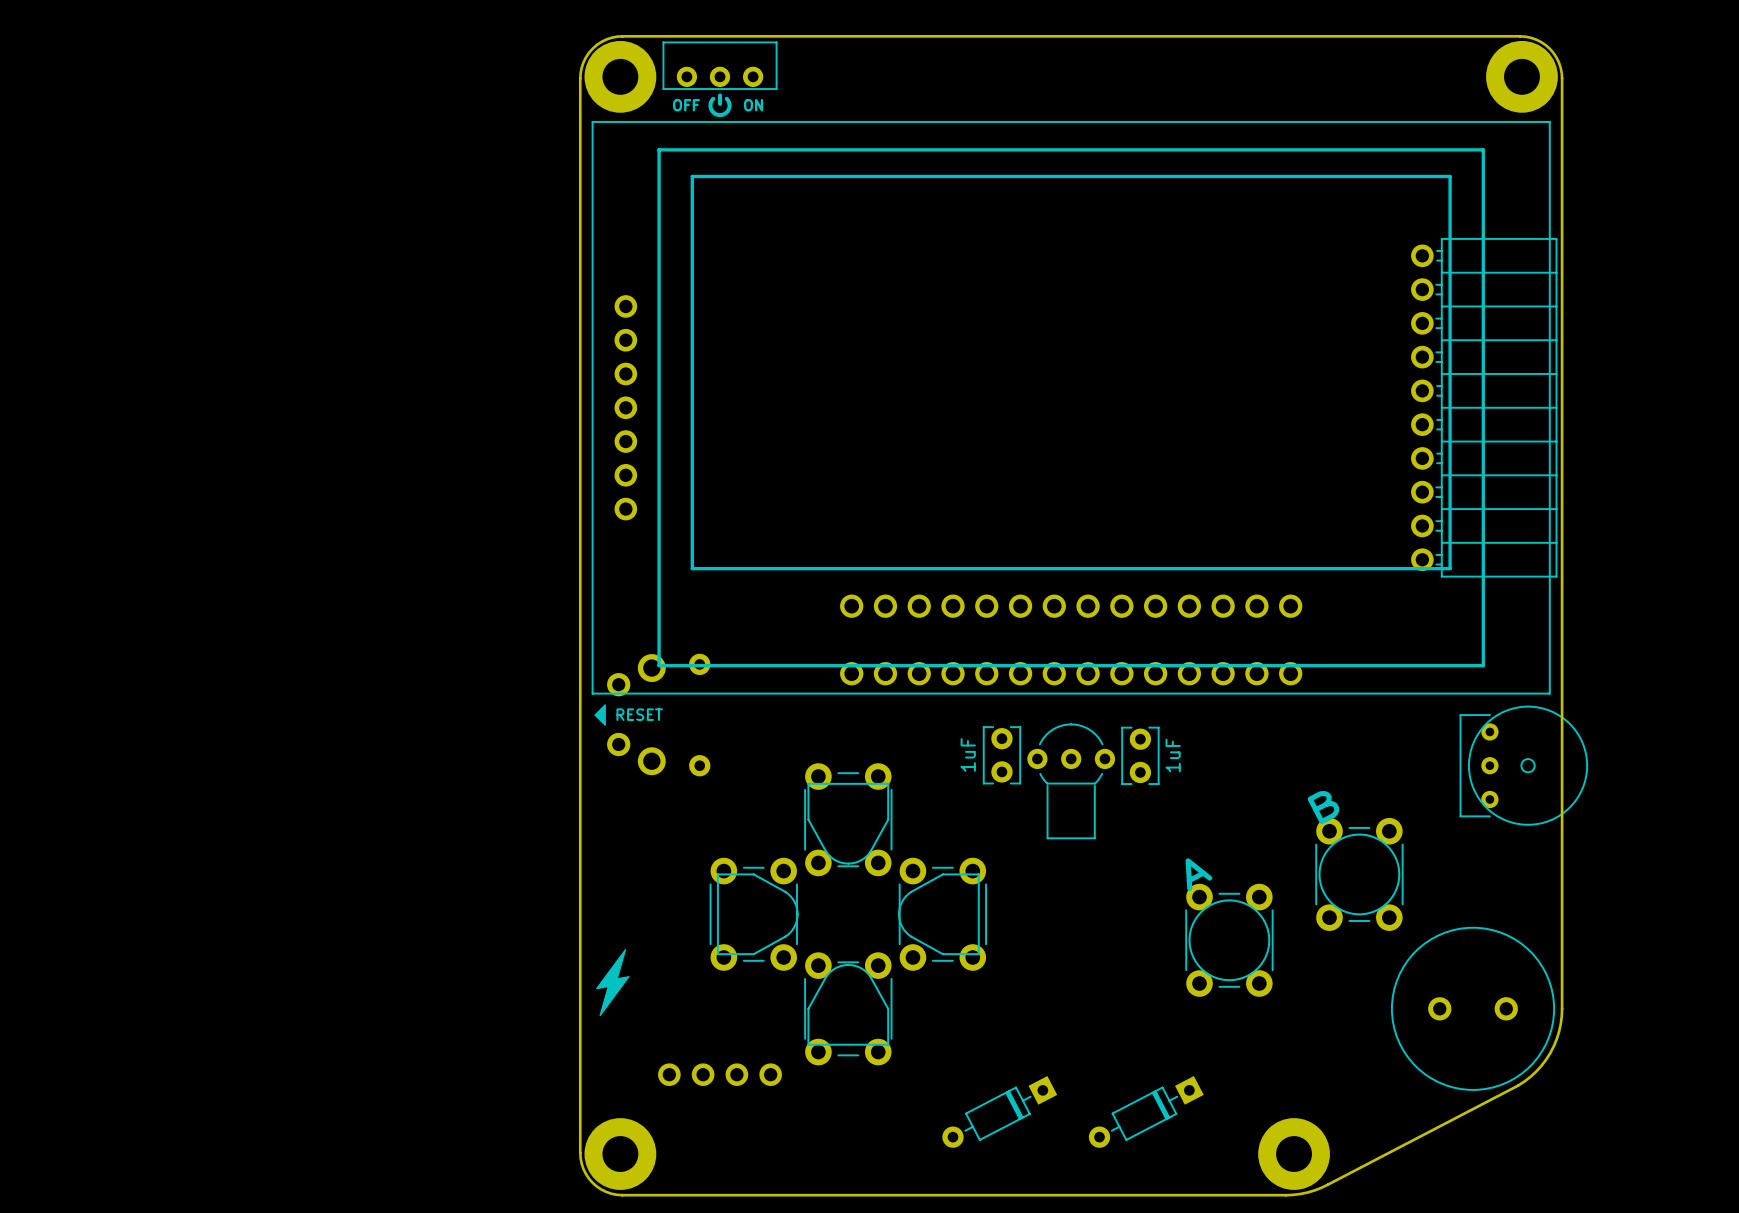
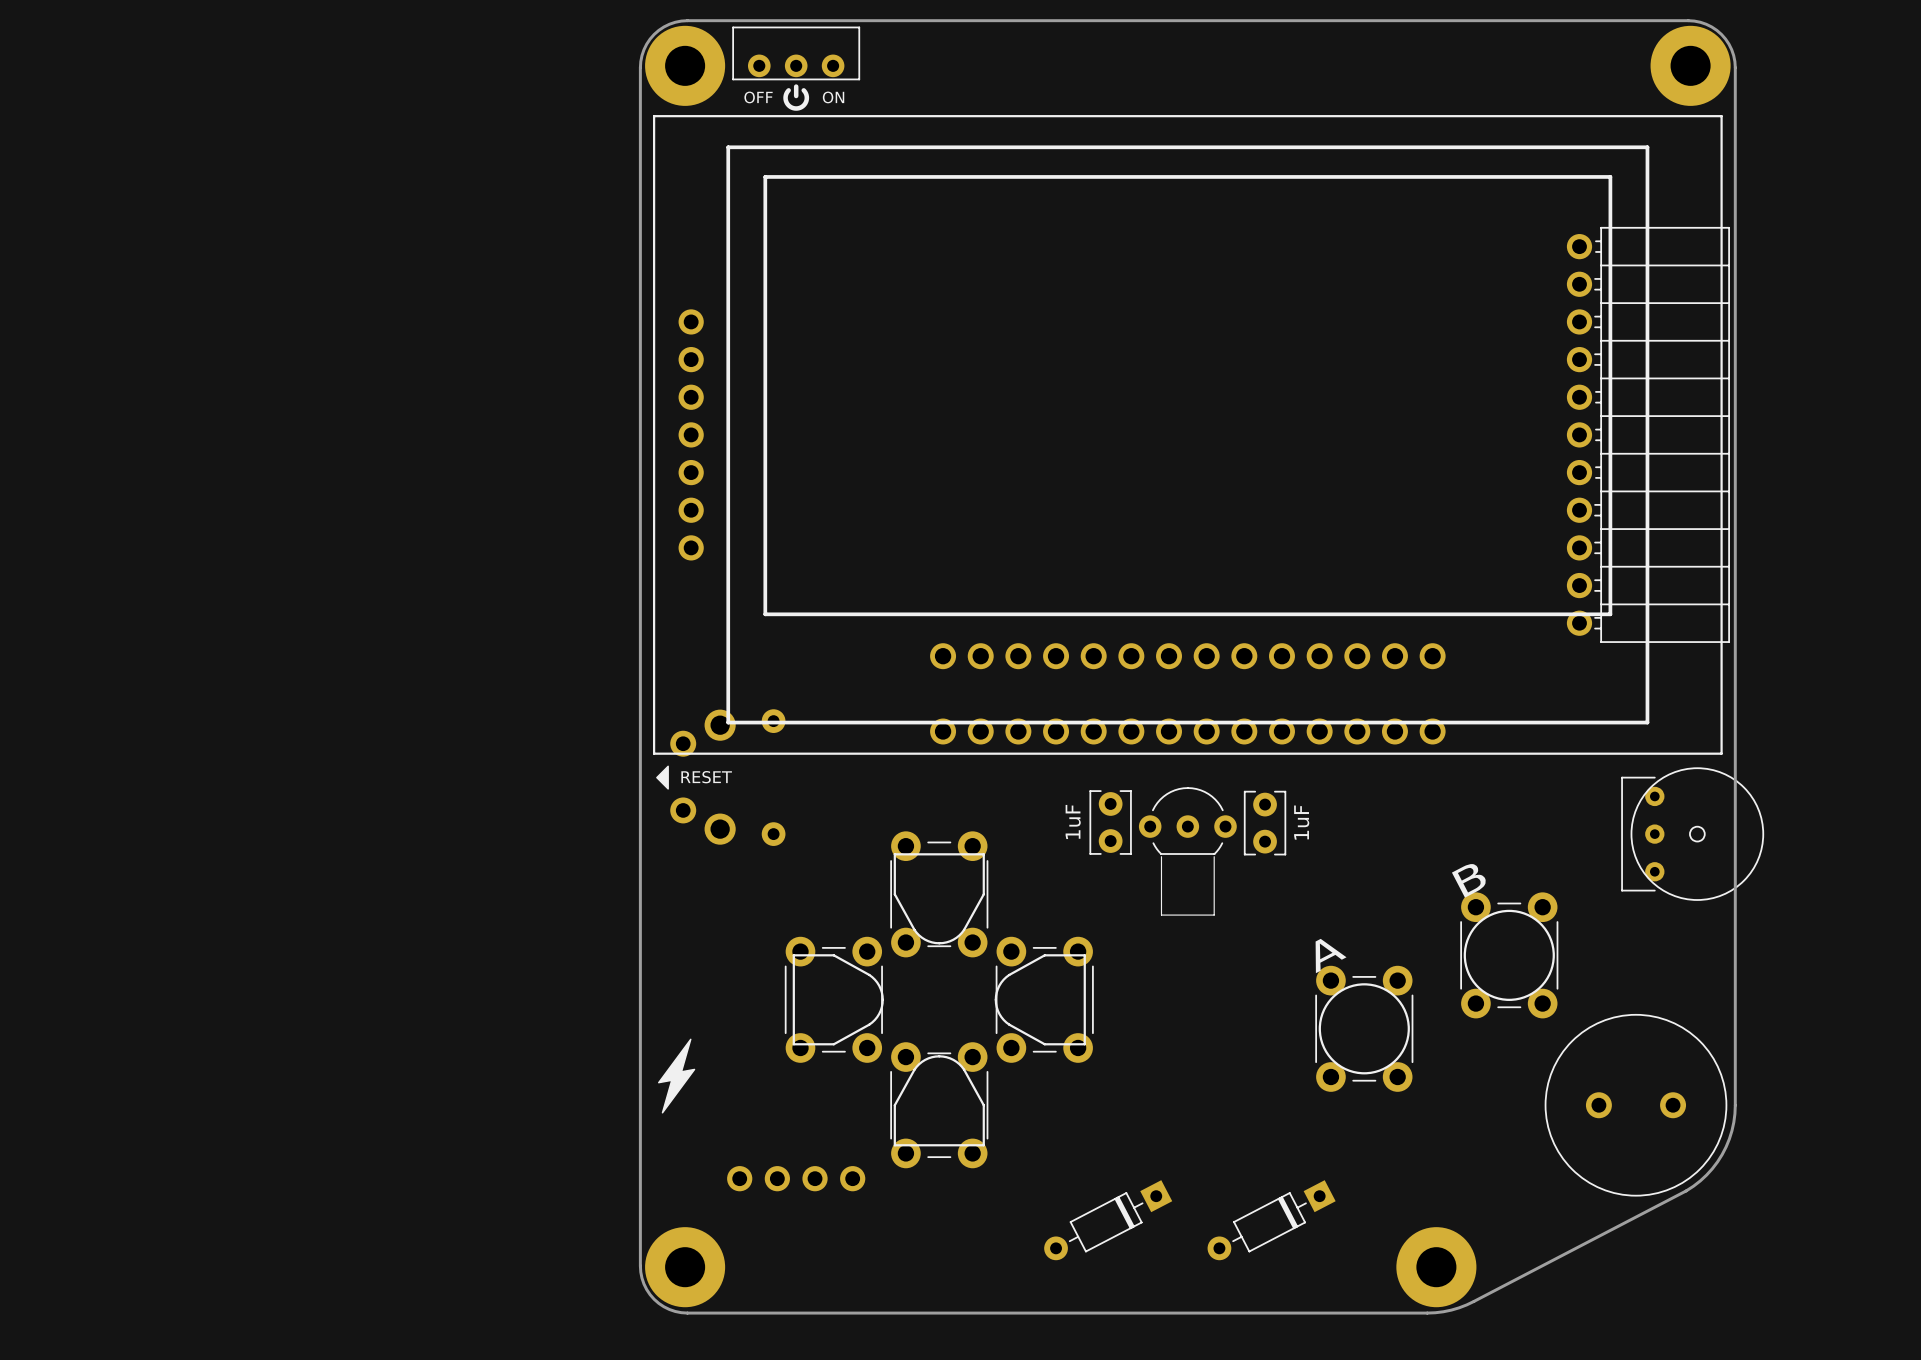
part footprint: [1411, 238, 1558, 578] -> [1566, 226, 1730, 643]

